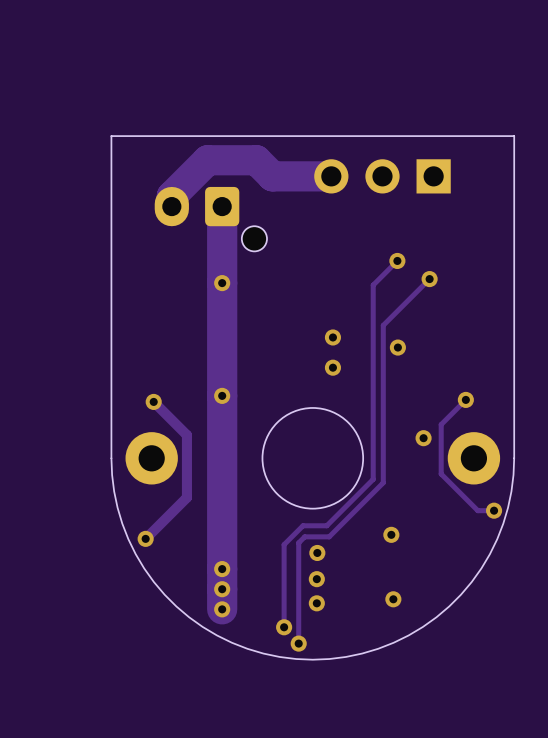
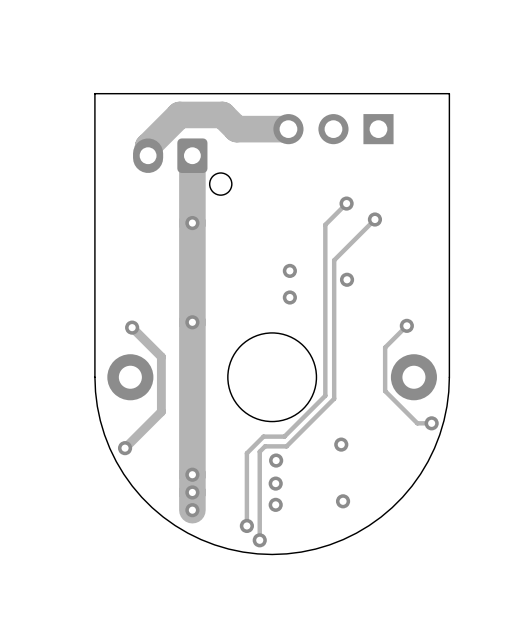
via: (423, 438) -> none

